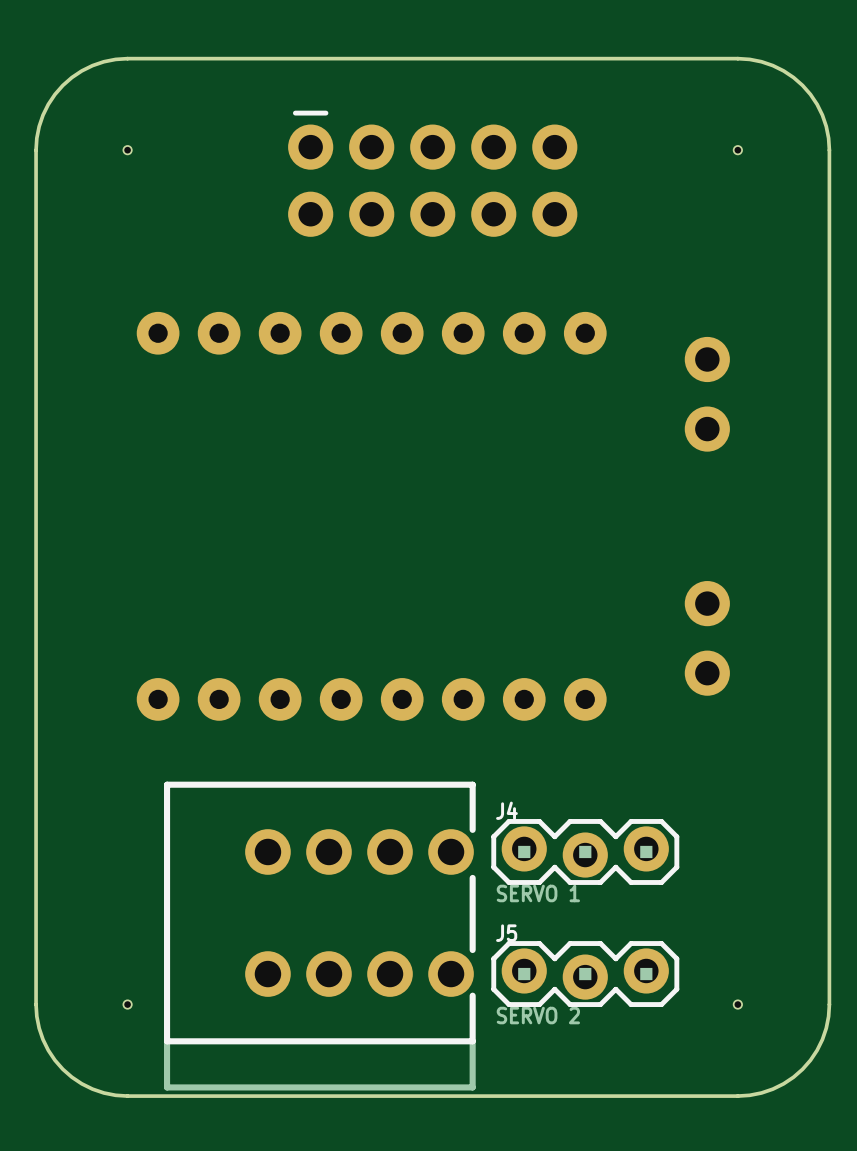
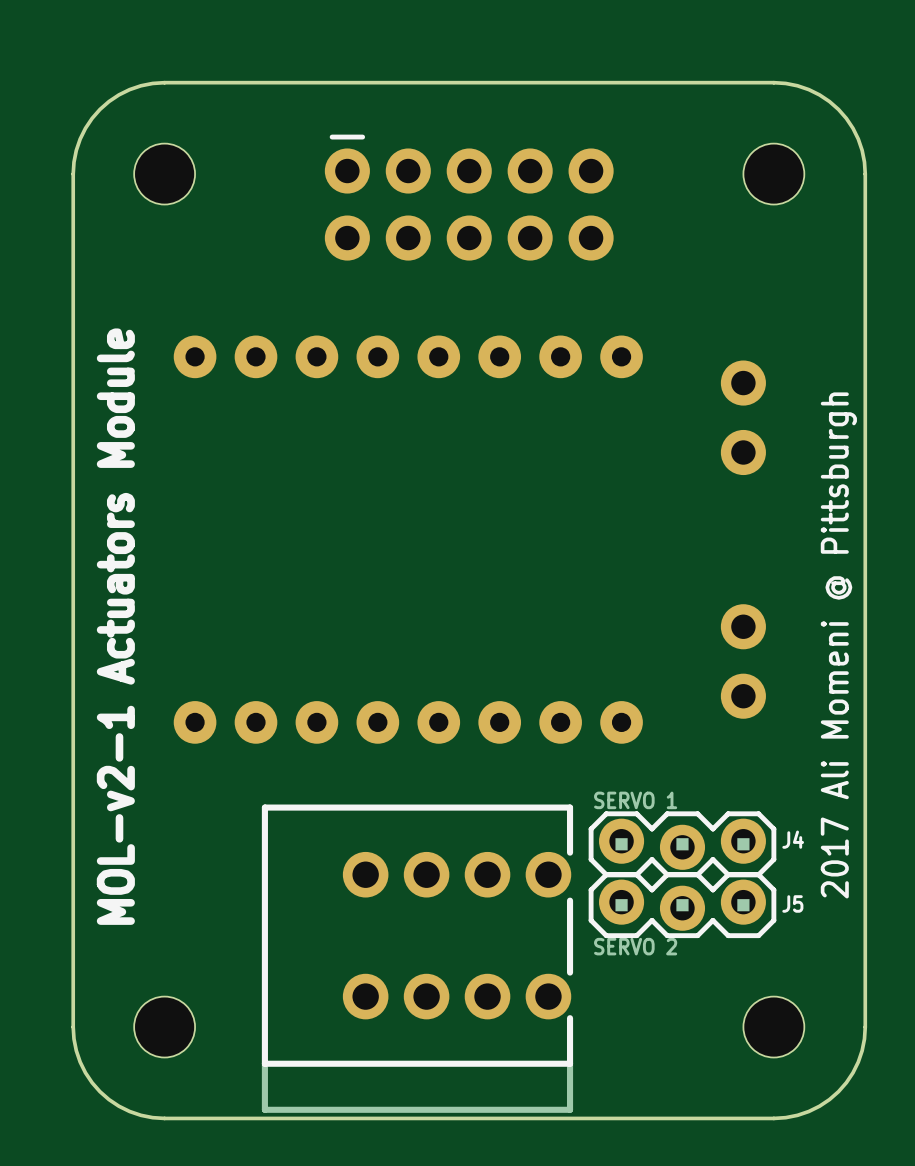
hole size: [123, 145, 132, 155] -> [134, 143, 196, 205]
hole size: [733, 145, 743, 155] -> [743, 143, 805, 205]
text: none -> MOL-v2-1 Actuators Module (115, 626)
text: none -> 2017 Ali Momeni @ Pittsburgh (838, 645)
J4 name position: J4 (506, 810) -> J4 (793, 839)
J4 position: (585, 851) -> (682, 844)
J4 value position: SERVO 1 (538, 893) -> SERVO 1 (635, 800)
J5 name position: J5 (506, 933) -> J5 (792, 903)
part position: (319, 936) -> (417, 958)
J5 position: (585, 974) -> (682, 905)
hole size: [123, 1000, 132, 1009] -> [134, 996, 196, 1058]
hole size: [733, 1000, 743, 1009] -> [743, 996, 805, 1058]

